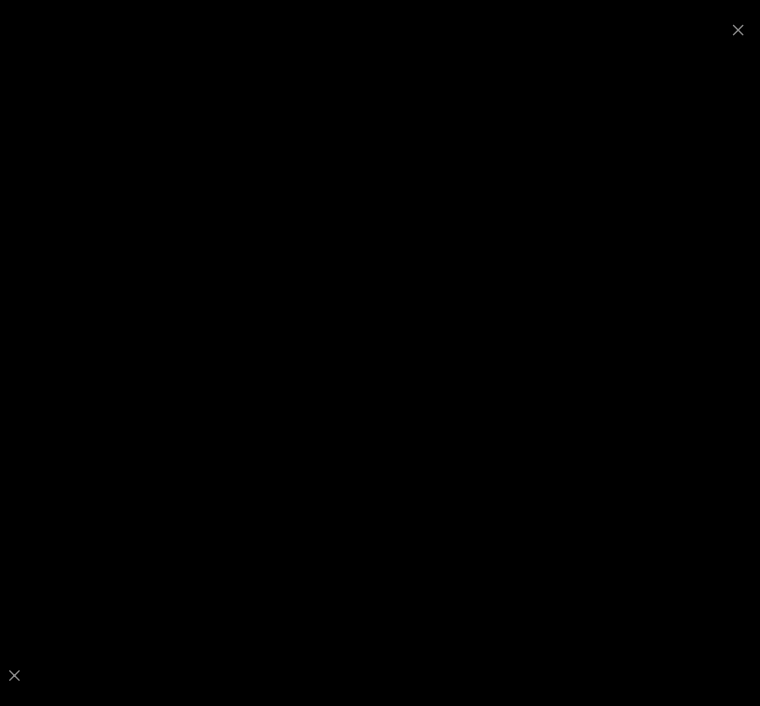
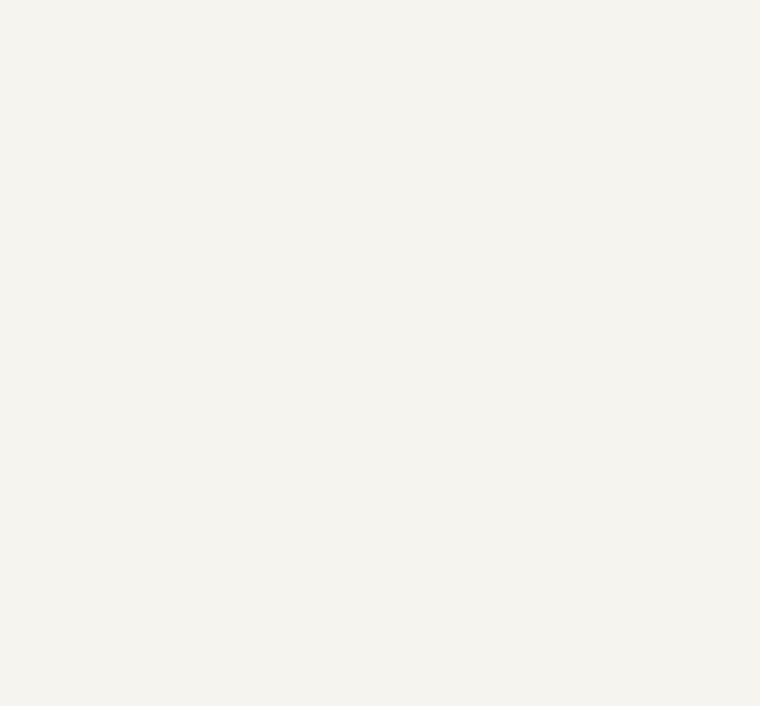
no-connect mark: (738, 30) -> none
no-connect mark: (14, 675) -> none

